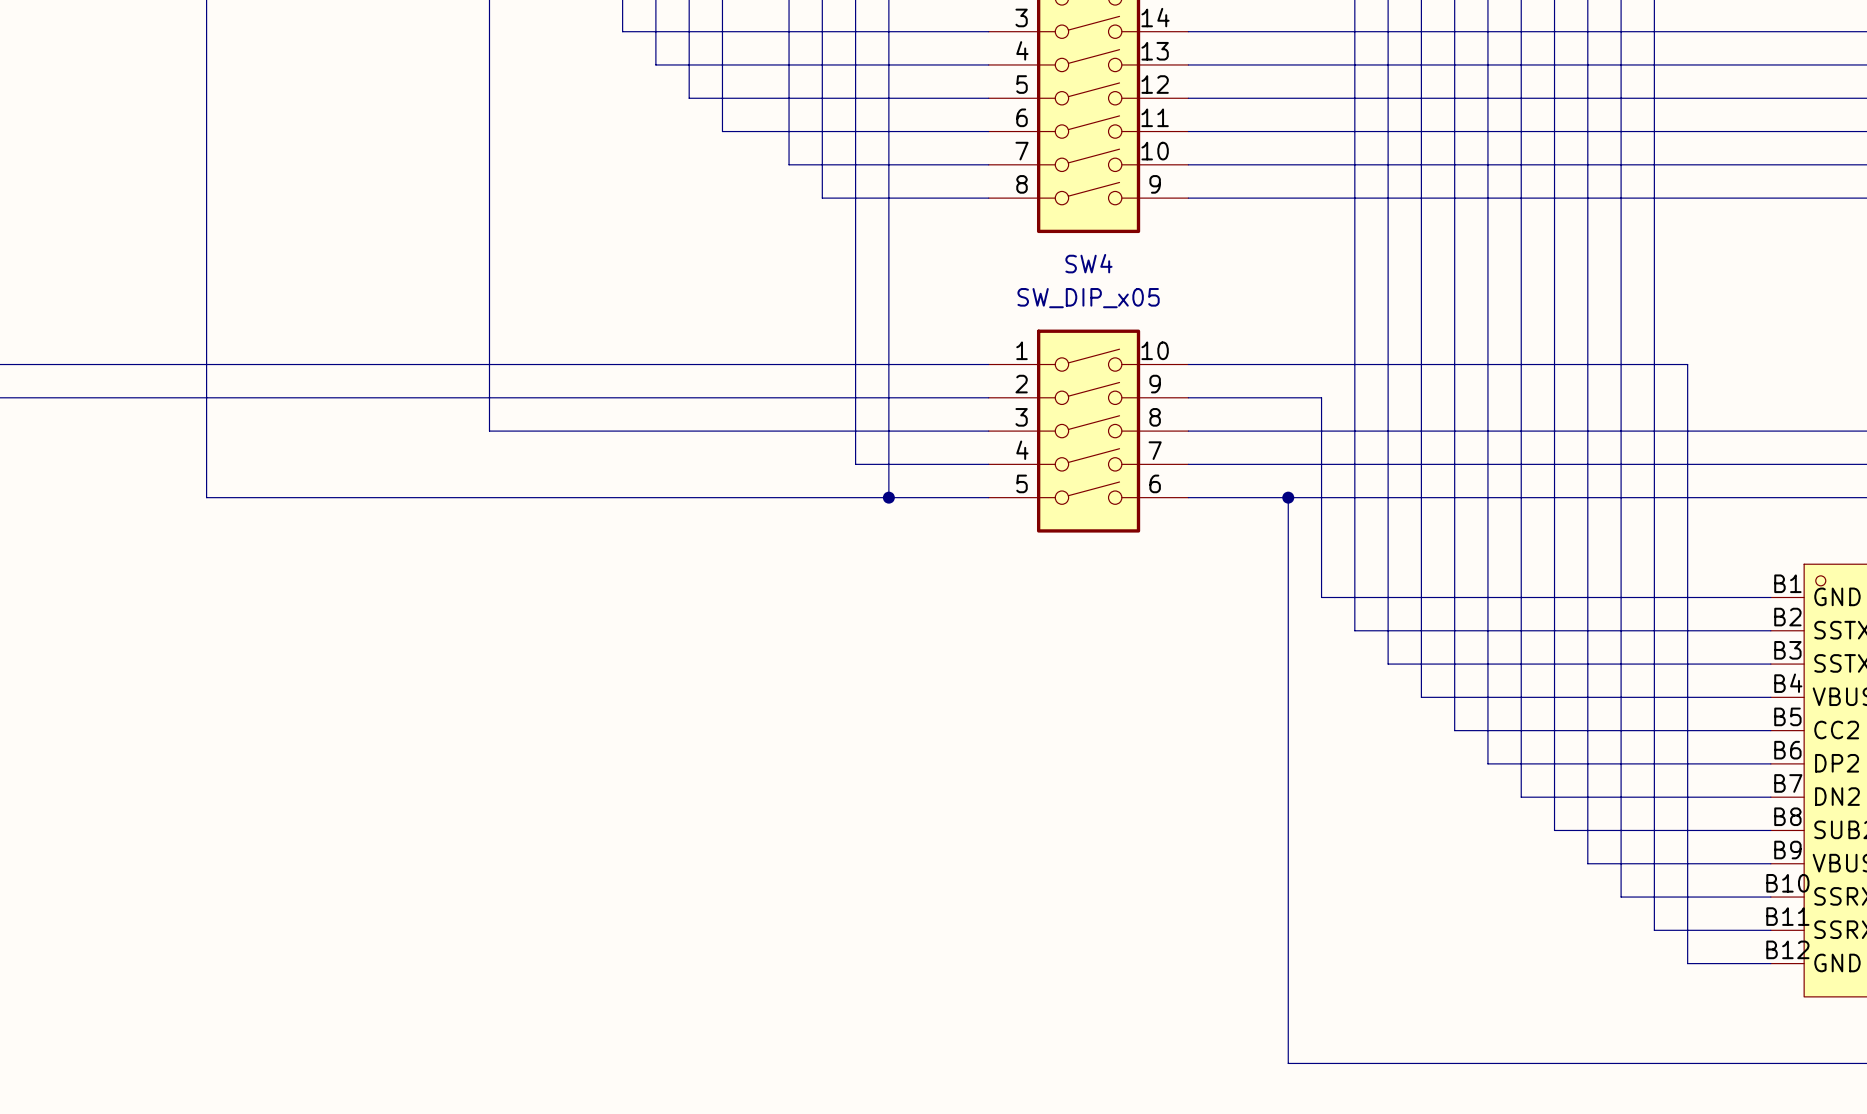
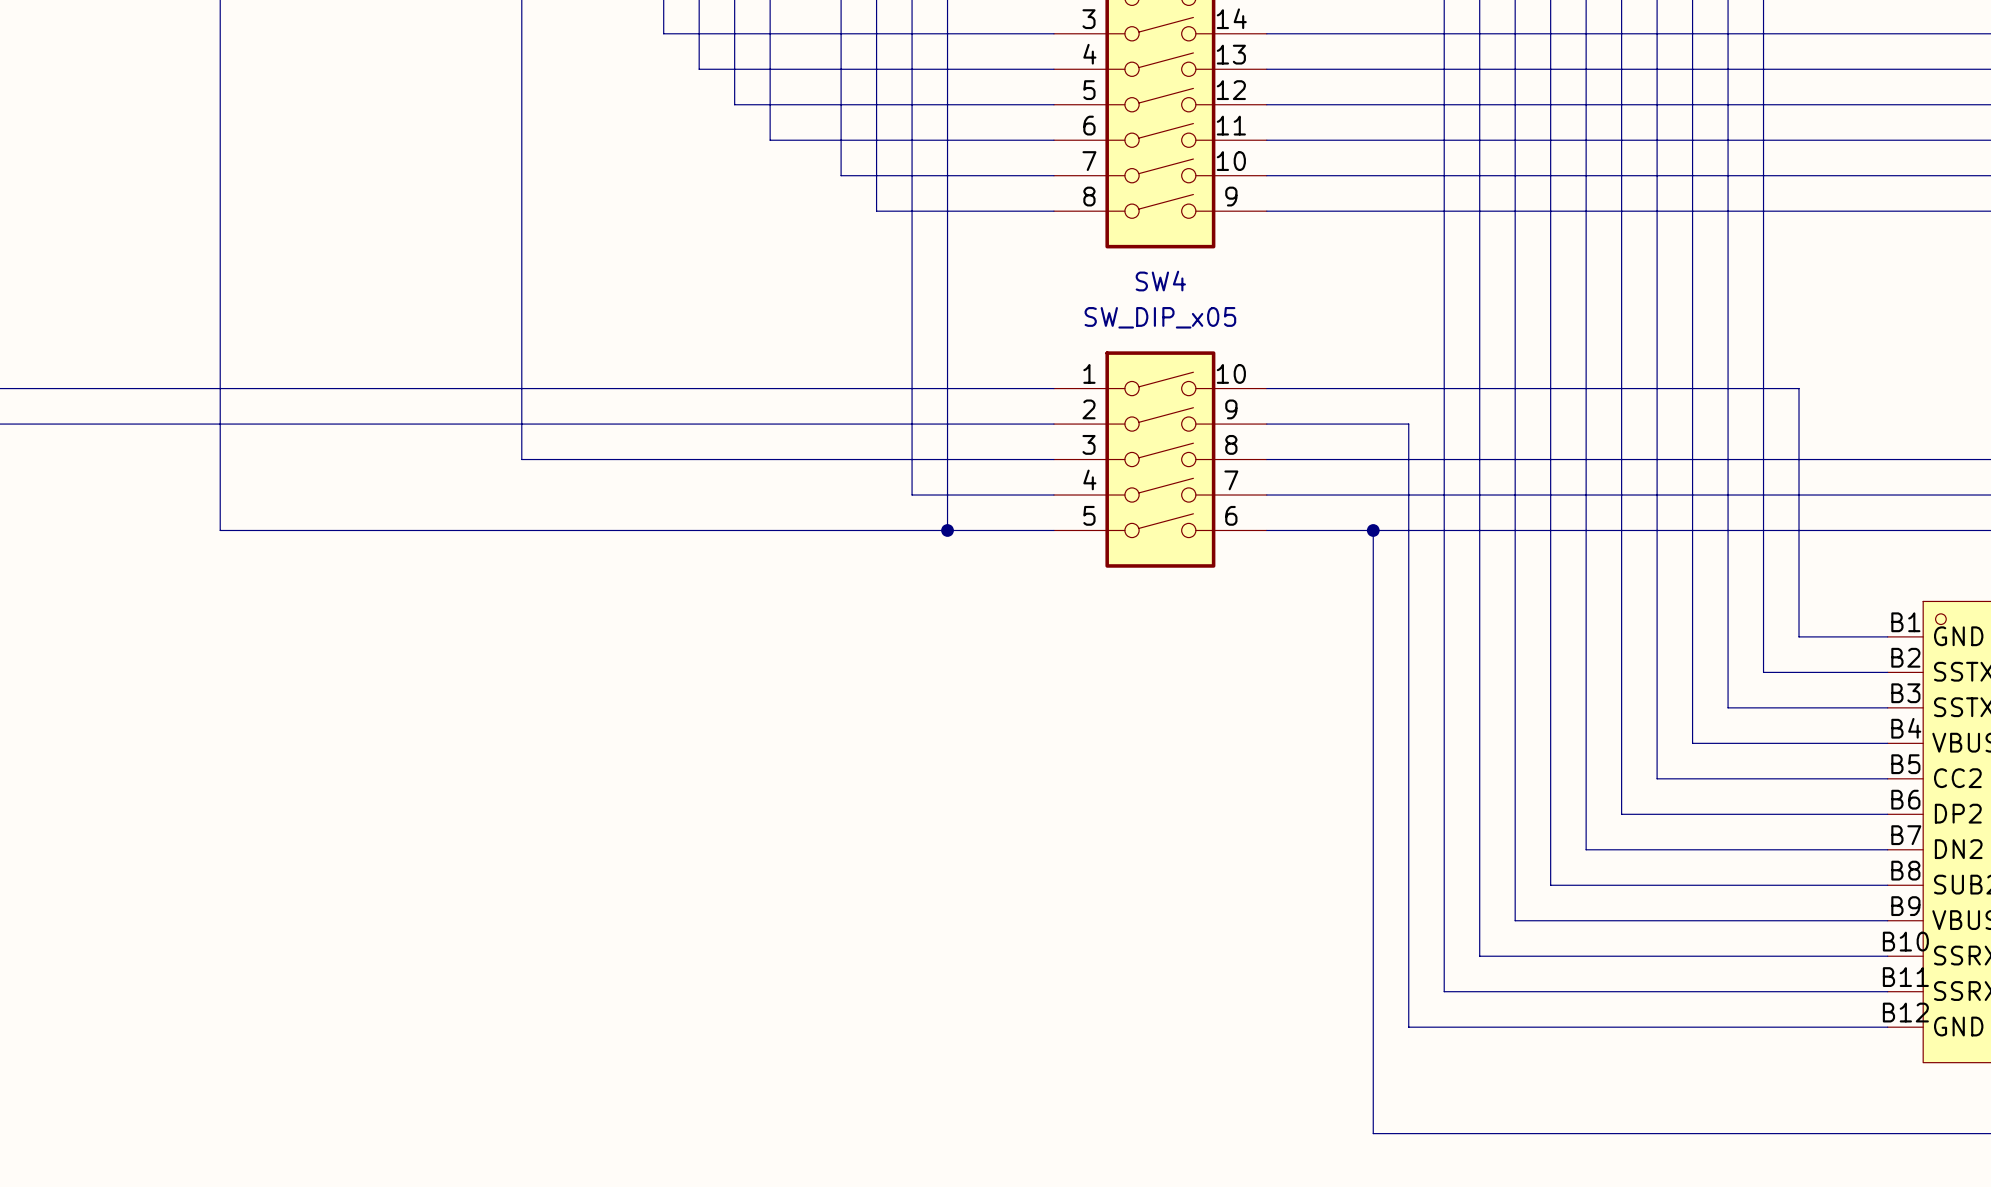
wire: (1321, 597) (1687, 597) (1687, 963) -> (1408, 636) (1408, 1027) (1799, 1027)
wire: (1354, 630) (1654, 630) (1654, 930) -> (1444, 672) (1444, 991) (1763, 991)
wire: (1388, 664) (1621, 664) (1621, 897) -> (1479, 707) (1479, 956) (1728, 956)
wire: (1421, 697) (1587, 697) (1587, 863) -> (1515, 743) (1515, 920) (1692, 920)
wire: (1454, 730) (1554, 730) (1554, 830) -> (1550, 778) (1550, 885) (1657, 885)
wire: (1487, 763) (1521, 763) (1521, 797) -> (1586, 814) (1586, 849) (1621, 849)

